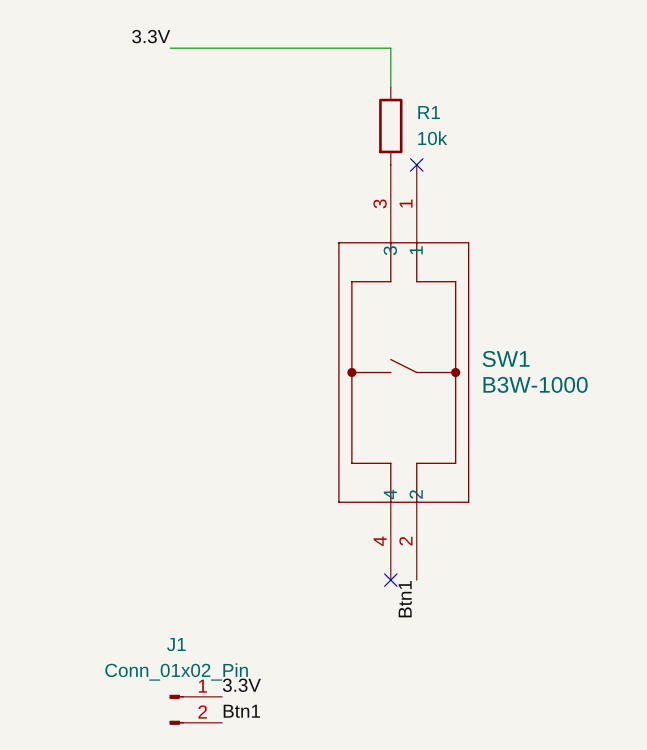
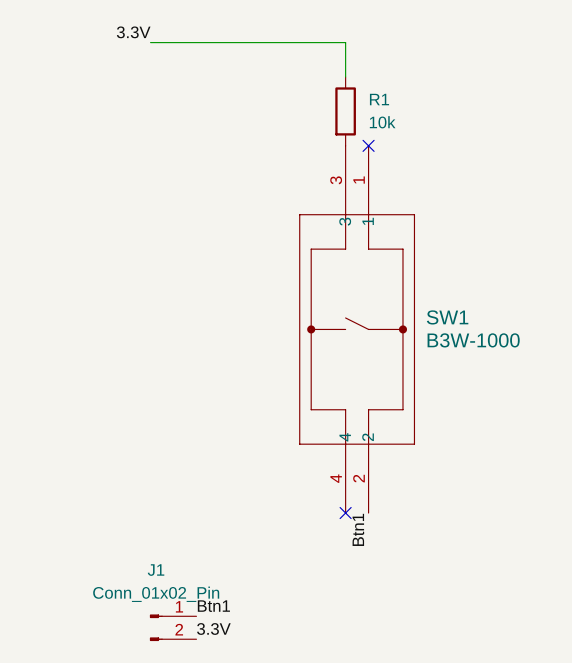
label: 3.3V (241, 685) -> Btn1 (213, 606)
label: Btn1 (241, 711) -> 3.3V (213, 628)

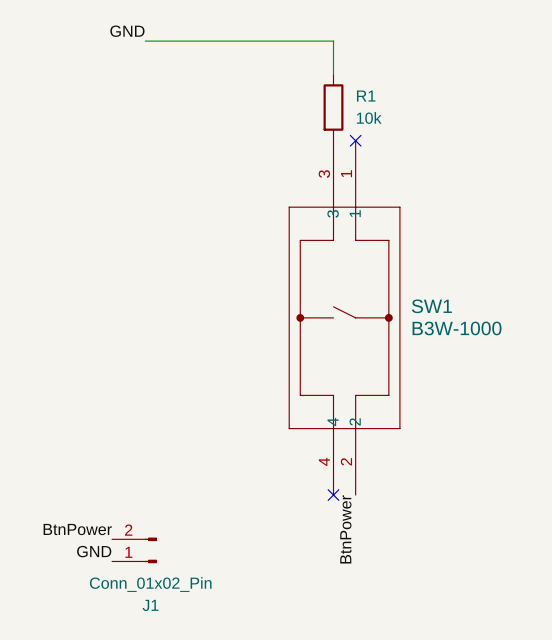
label: 3.3V (133, 32) -> GND (127, 31)
label: Btn1 (358, 529) -> BtnPower (345, 529)
label: none -> BtnPower (77, 529)
label: none -> GND (94, 551)
label: Btn1 (213, 606) -> none
J1 rotation: 0° (156, 627) -> 180° (150, 550)
J1 position: (173, 627) -> (134, 550)
label: 3.3V (213, 628) -> none

